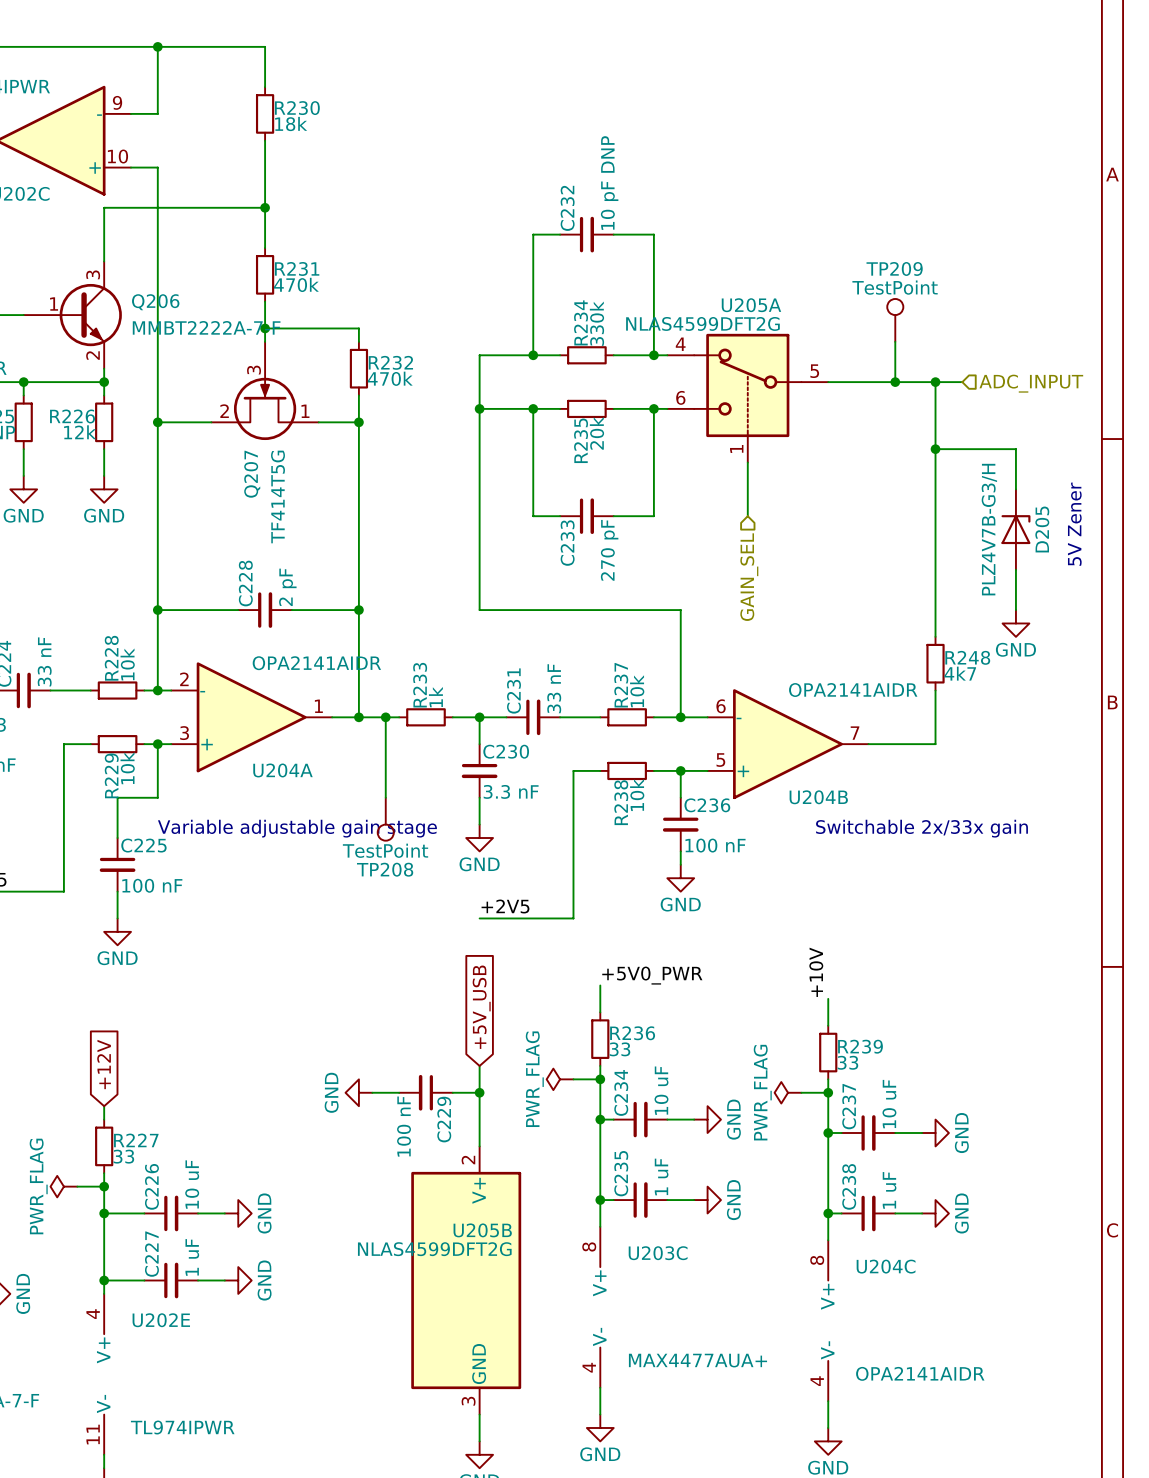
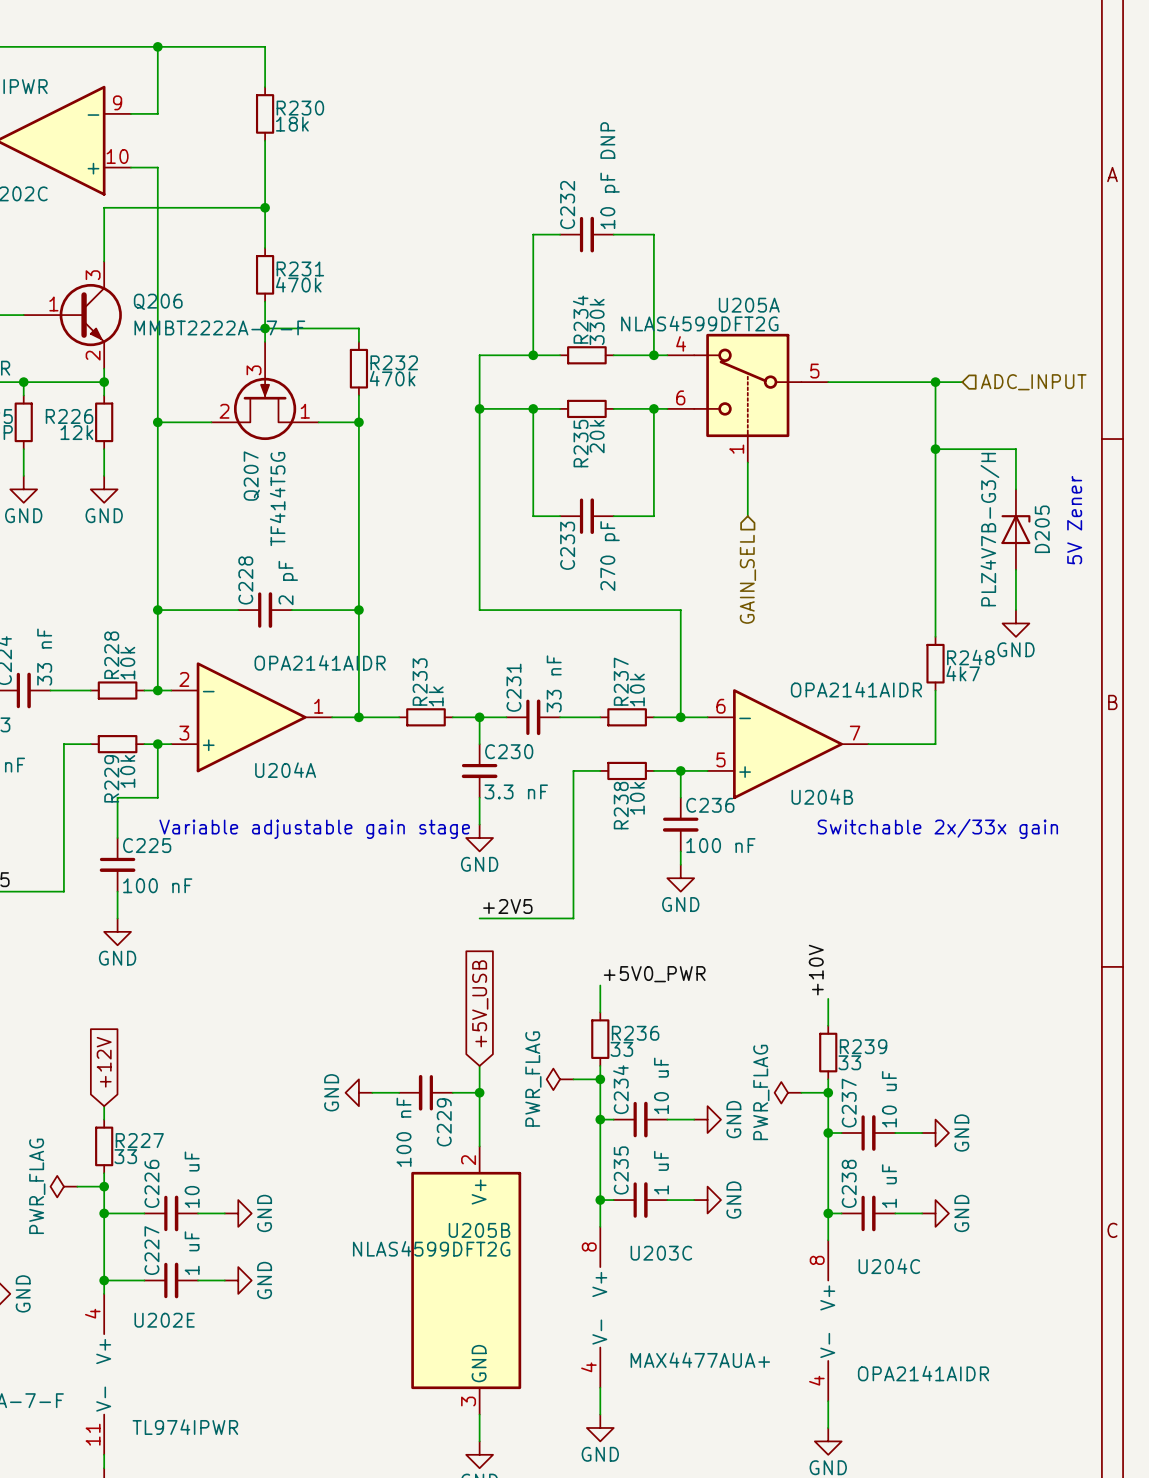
TP209: TestPoint (895, 320) -> none
wire: (895, 341) (895, 382) -> none
junction: (895, 382) -> none
wire: (385, 717) (385, 797) -> none
junction: (385, 717) -> none
TP208: TestPoint (385, 819) -> none

